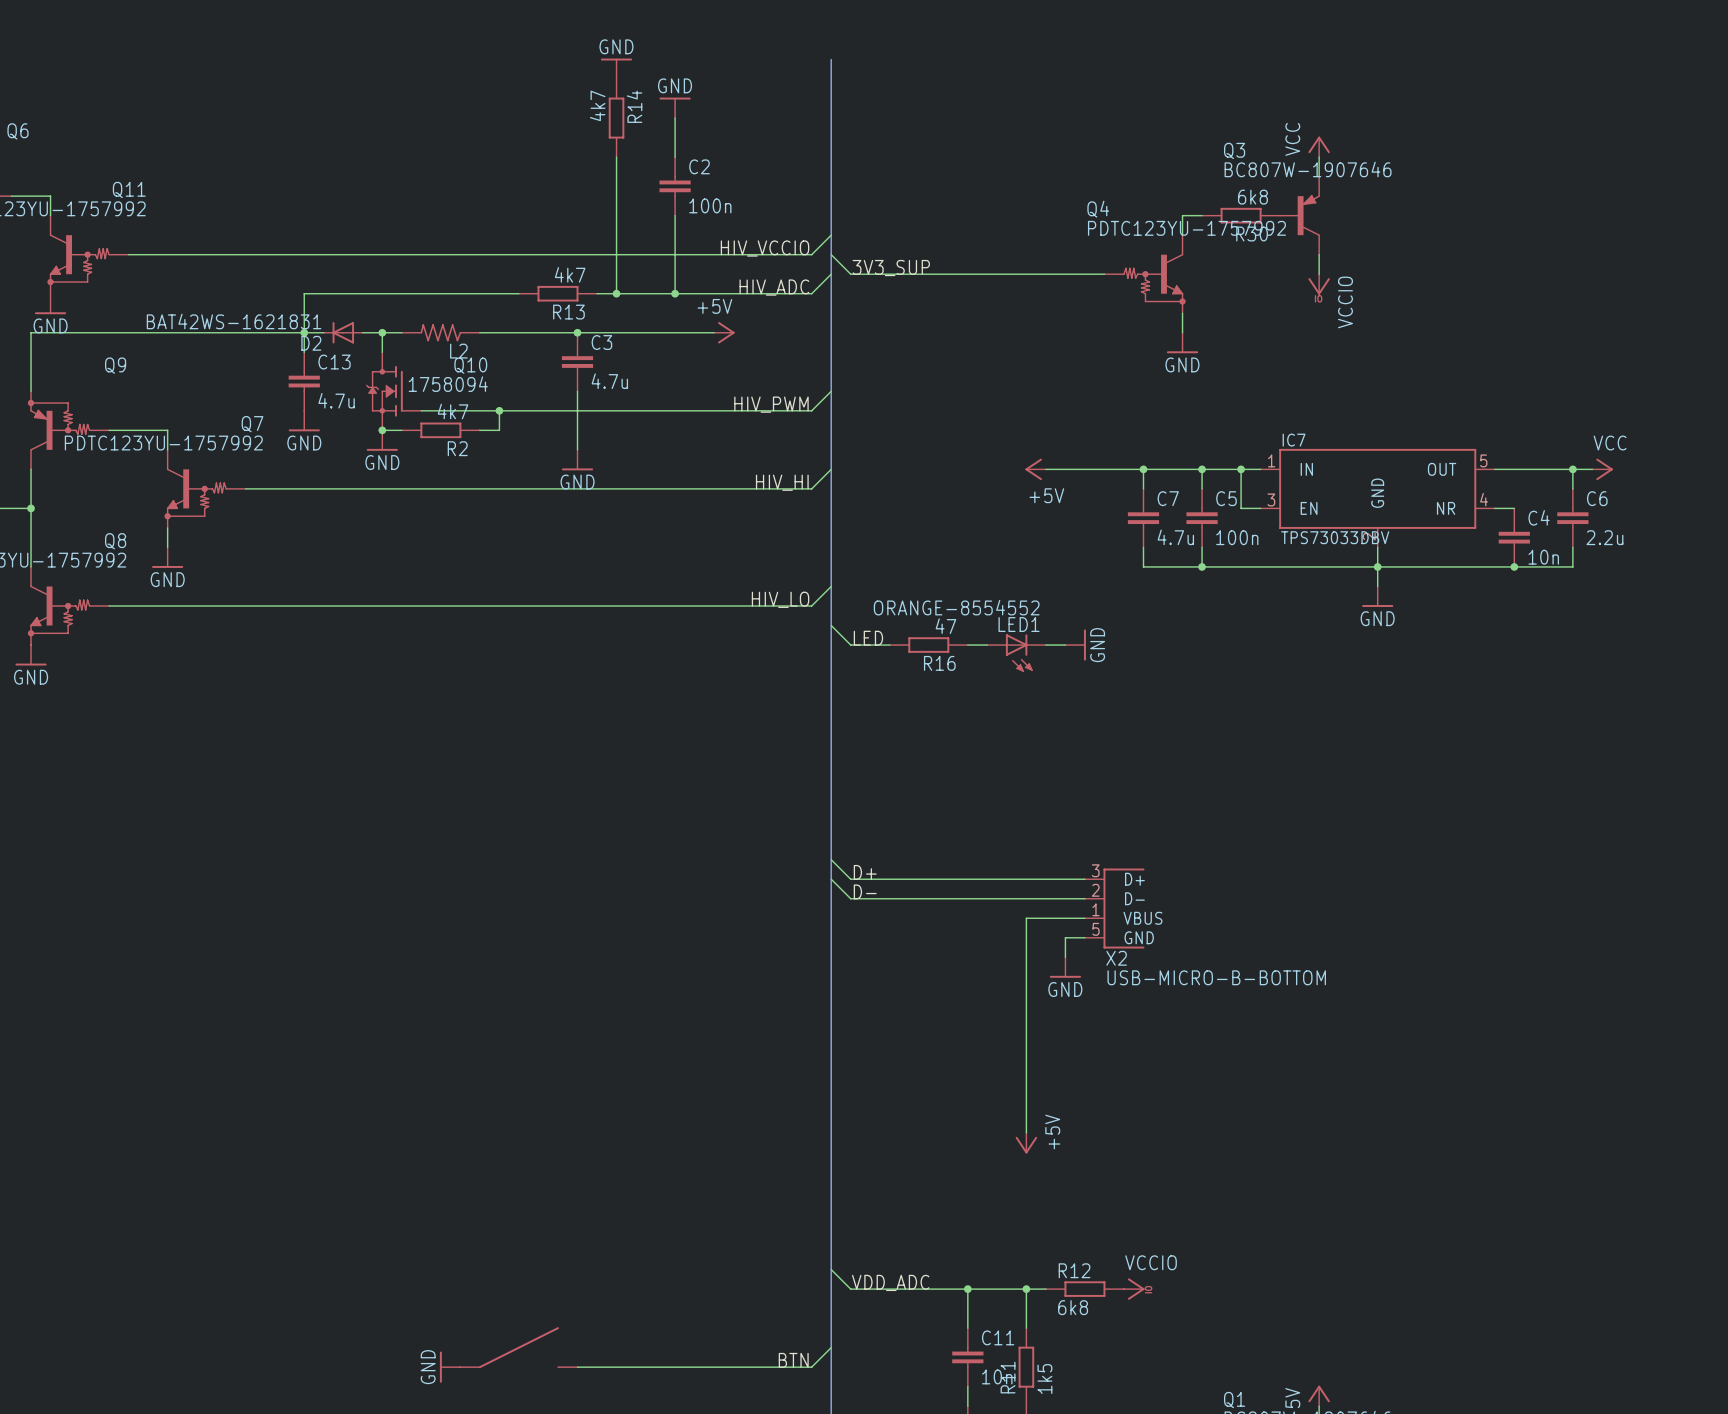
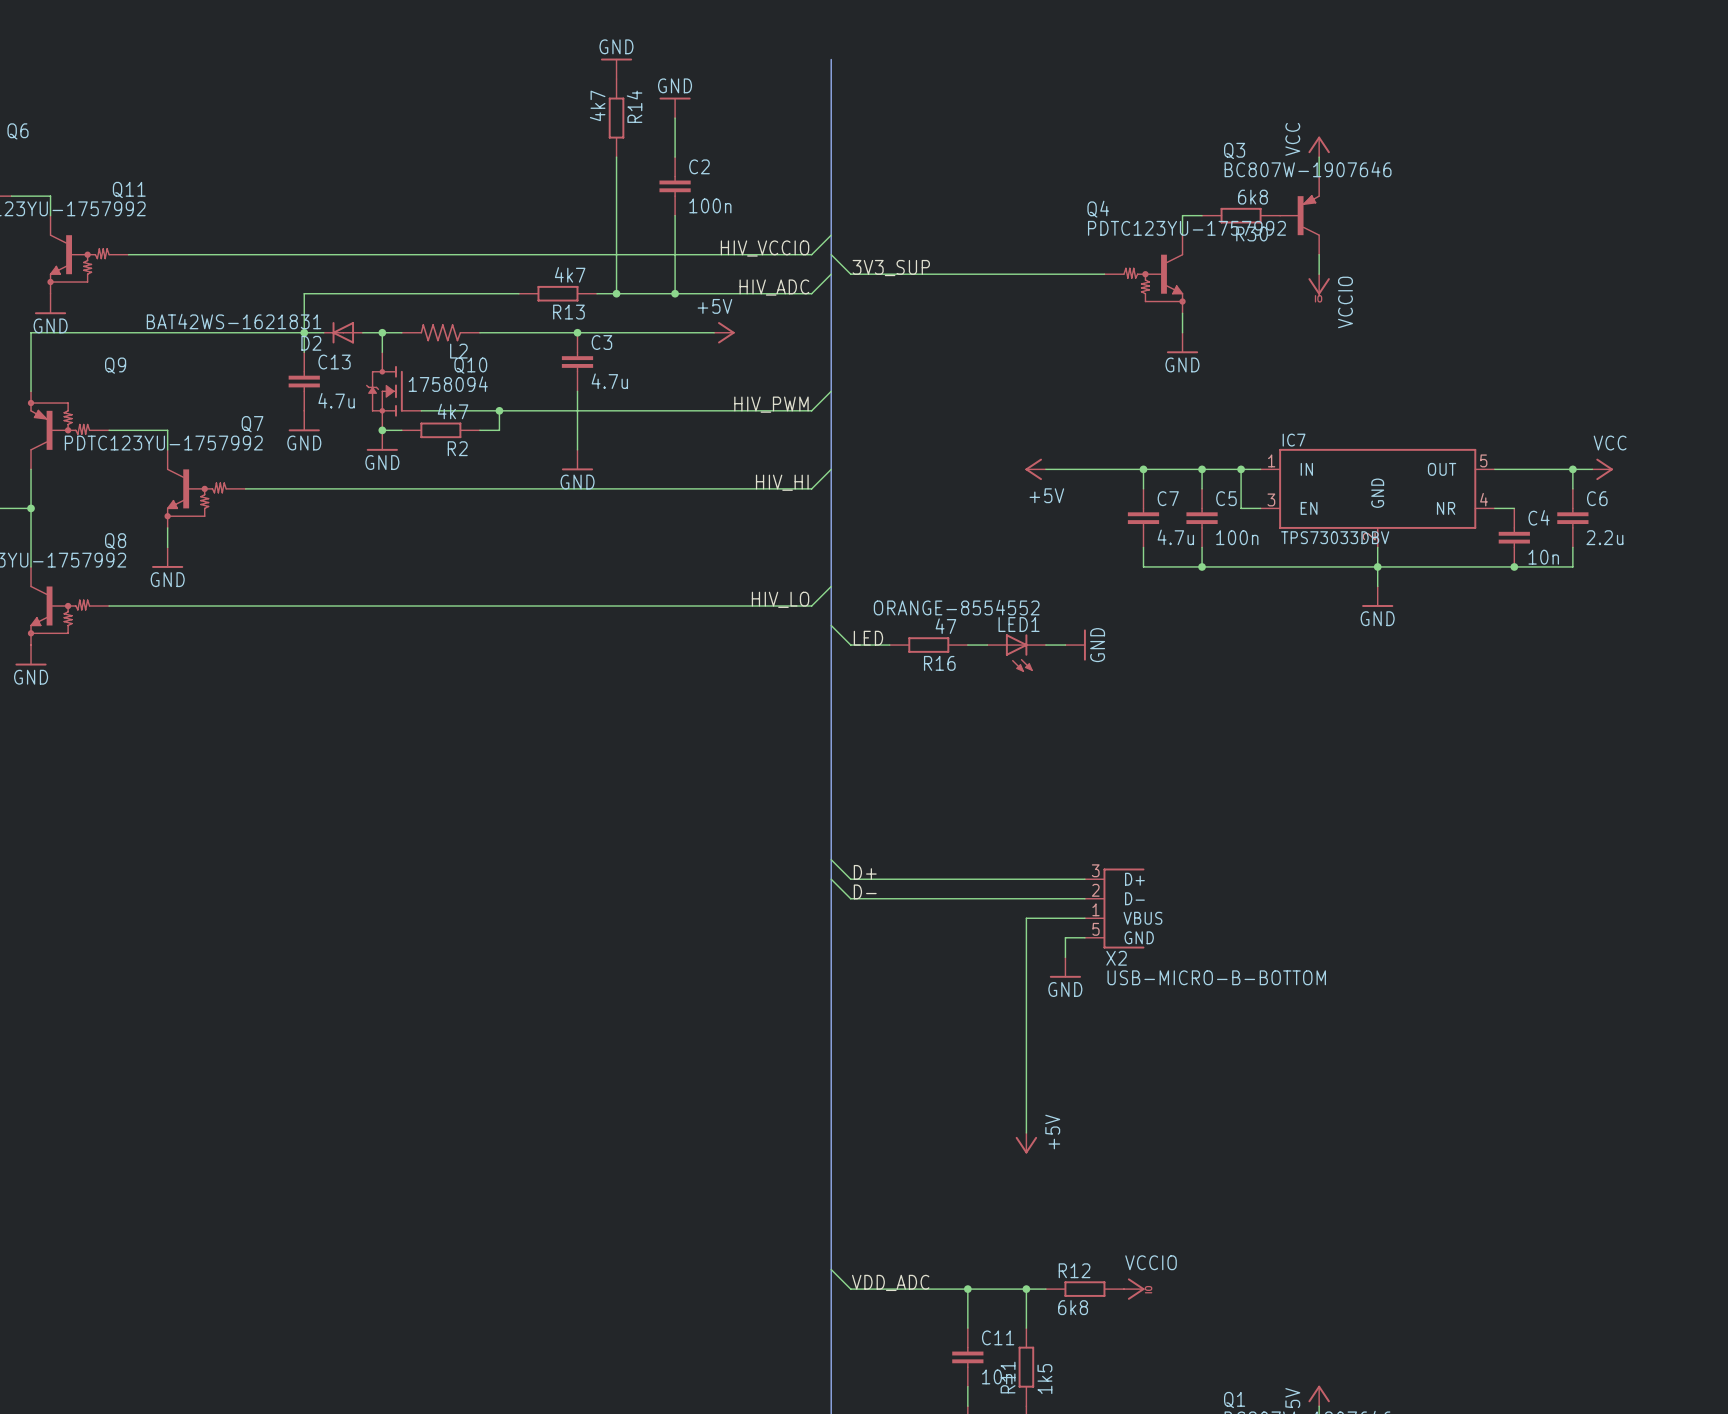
part: (518, 1347) -> none
wire: (831, 1347) (811, 1367) (577, 1367) -> none
label: BTN (793, 1360) -> none
power symbol: GND (450, 1367) -> none

